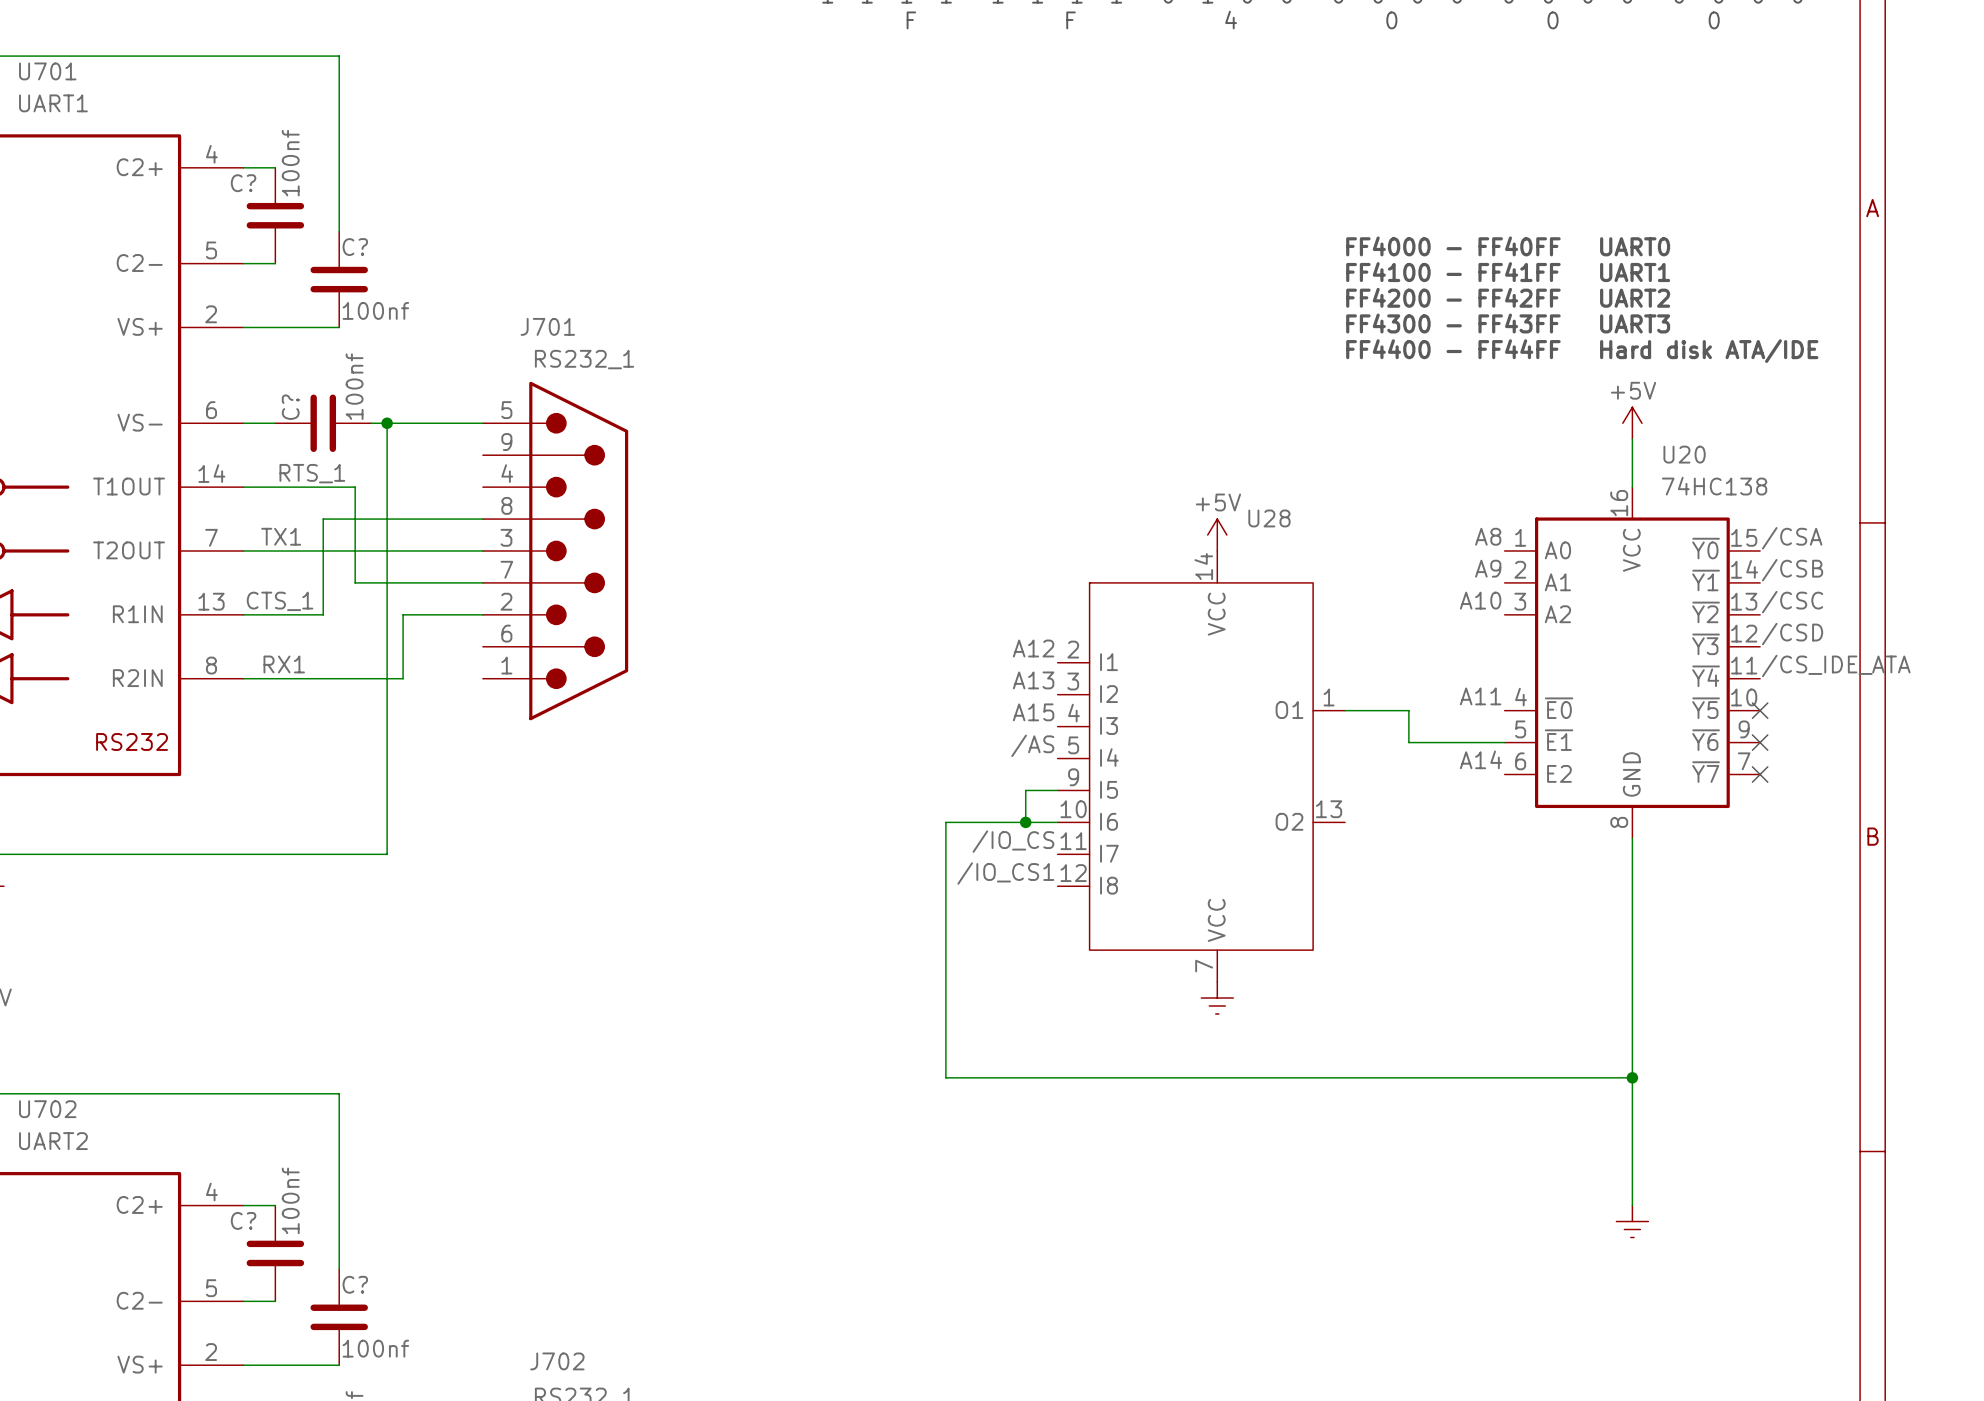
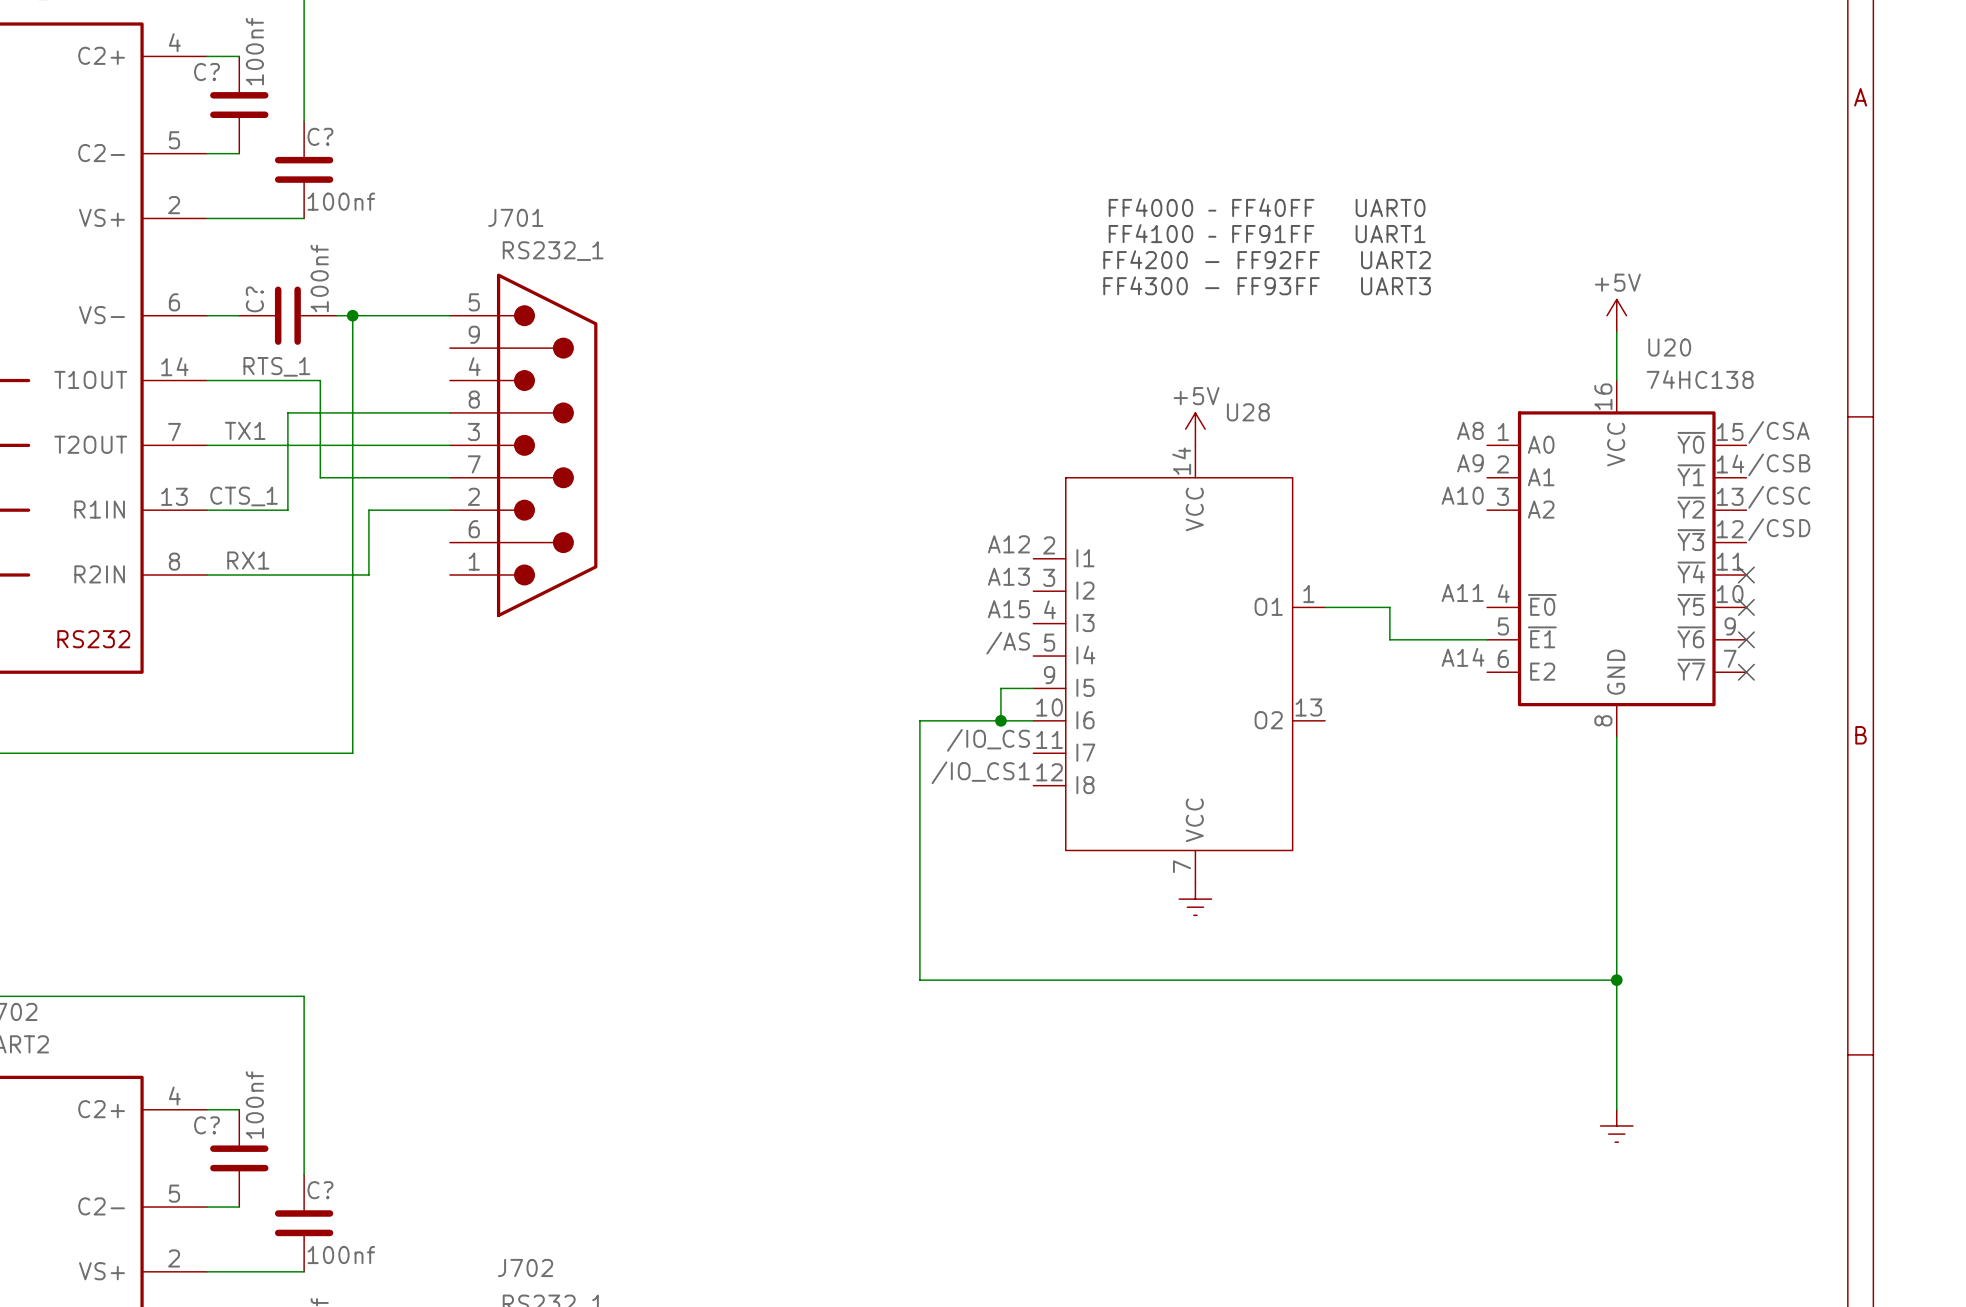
text: FF4000 - FF40FF UART0 (1508, 246) -> none
text: FF4100 - FF41FF UART1 (1508, 272) -> none
text: FF4200 - FF42FF UART2 (1508, 297) -> none
text: none -> FF4000 – FF40FF UART0 (1267, 207)
text: FF4300 - FF43FF UART3 (1508, 323) -> none
text: none -> FF4100 – FF91FF UART1 (1267, 233)
text: FF4400 - FF44FF Hard disk ATA/IDE (1582, 351) -> none
text: none -> FF4200 - FF92FF UART2 (1267, 259)
text: none -> FF4300 - FF93FF UART3 (1267, 285)
label: /CS_IDE_ATA (1836, 665) -> none
no-connect mark: none -> (1746, 575)

